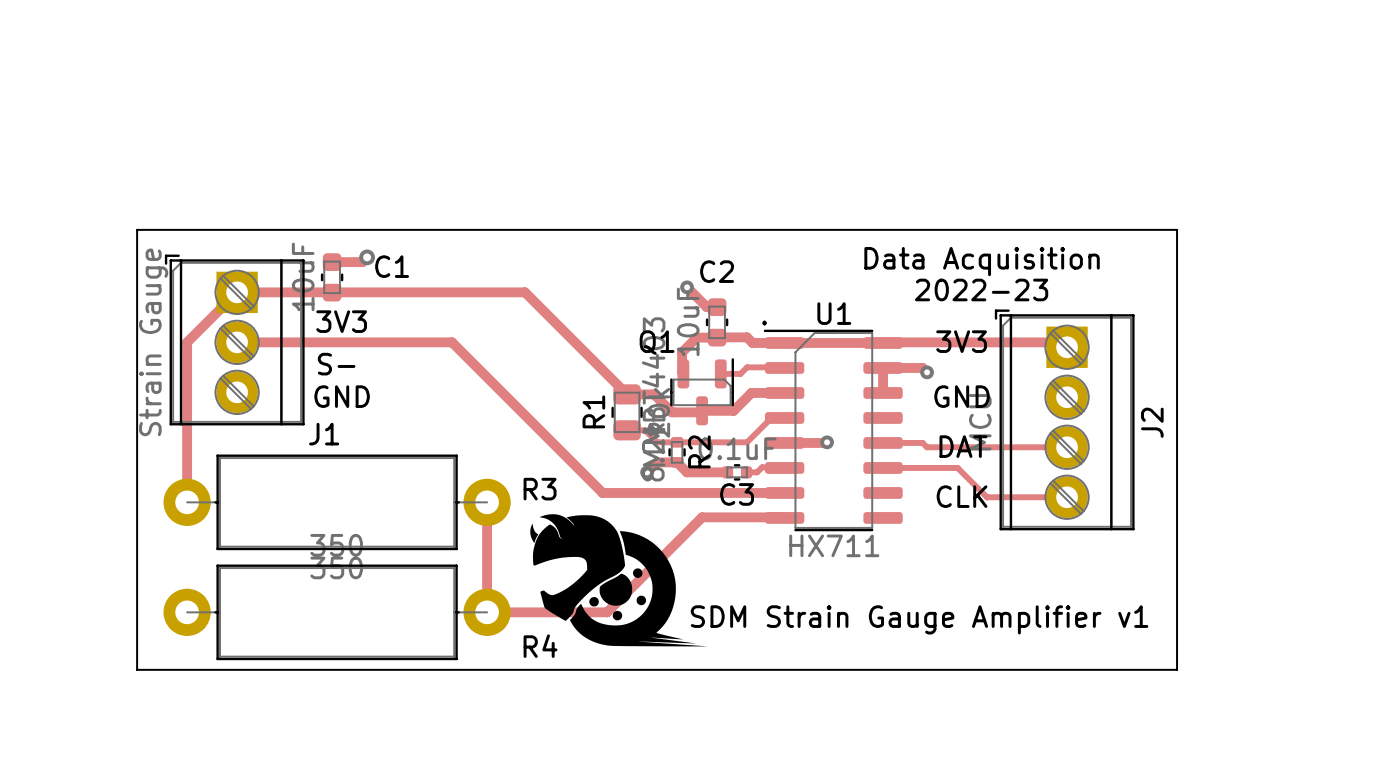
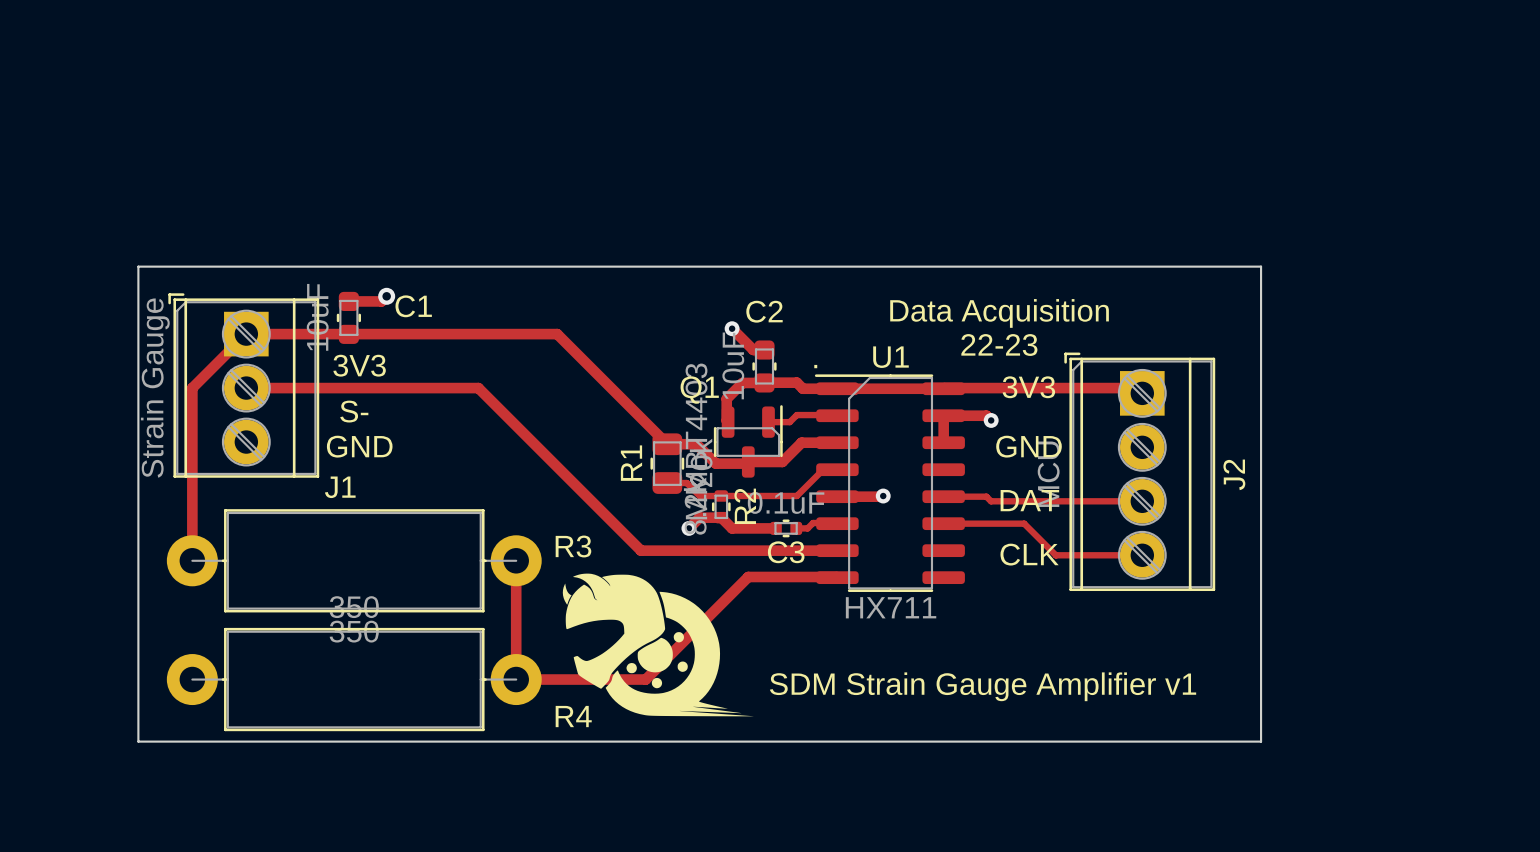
text position: Data Acquisition (982, 261) -> Data Acquisition (999, 313)
text: 2022-23 (981, 289) -> 22-23 (999, 345)

